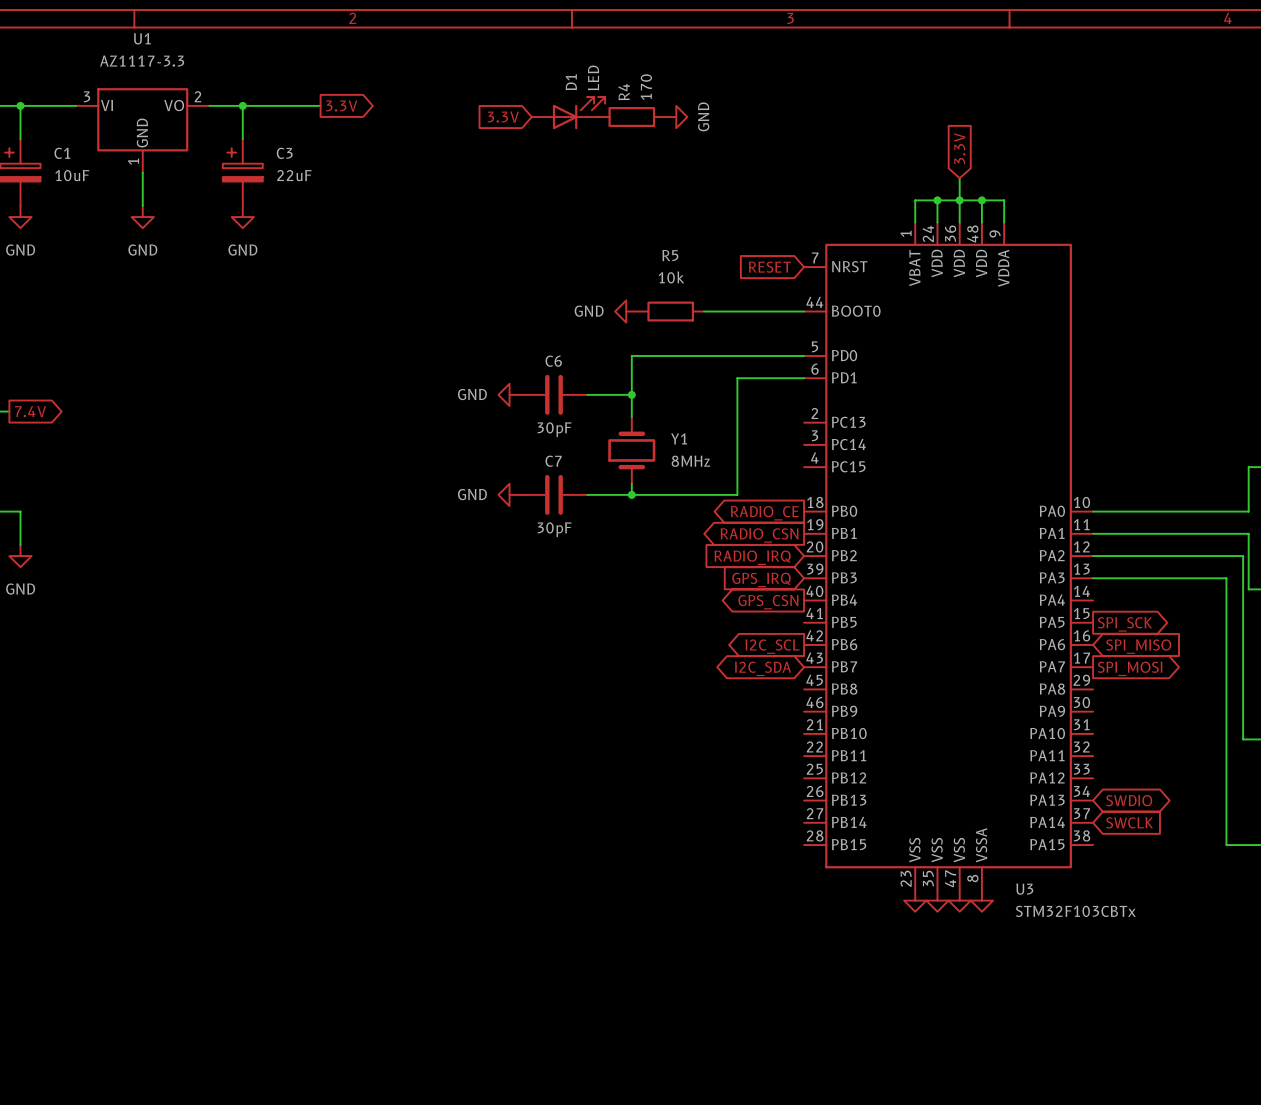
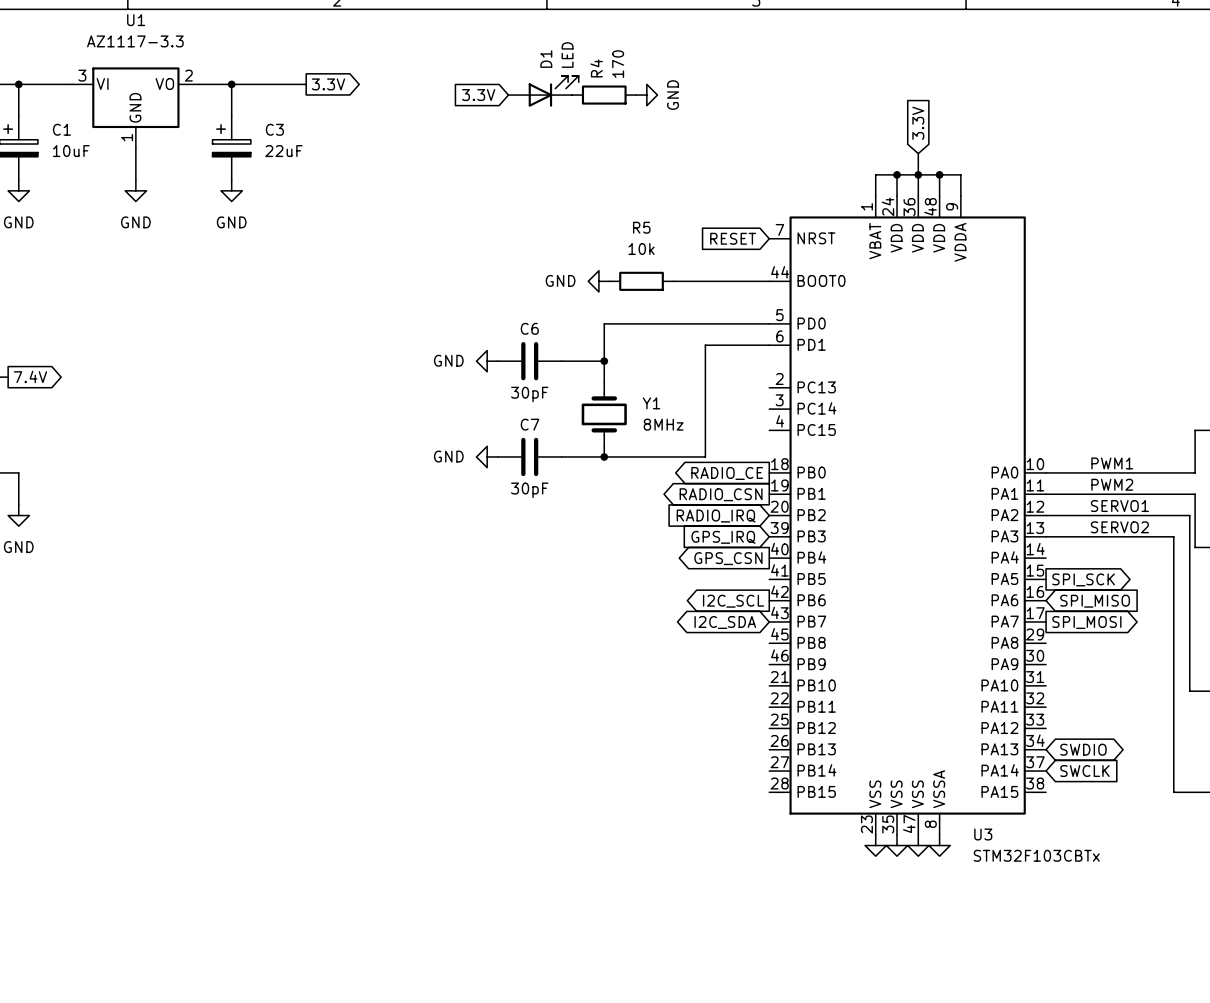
label: none -> PWM1 (1112, 463)
label: none -> PWM2 (1112, 484)
label: none -> SERVO1 (1119, 506)
label: none -> SERVO2 (1119, 527)

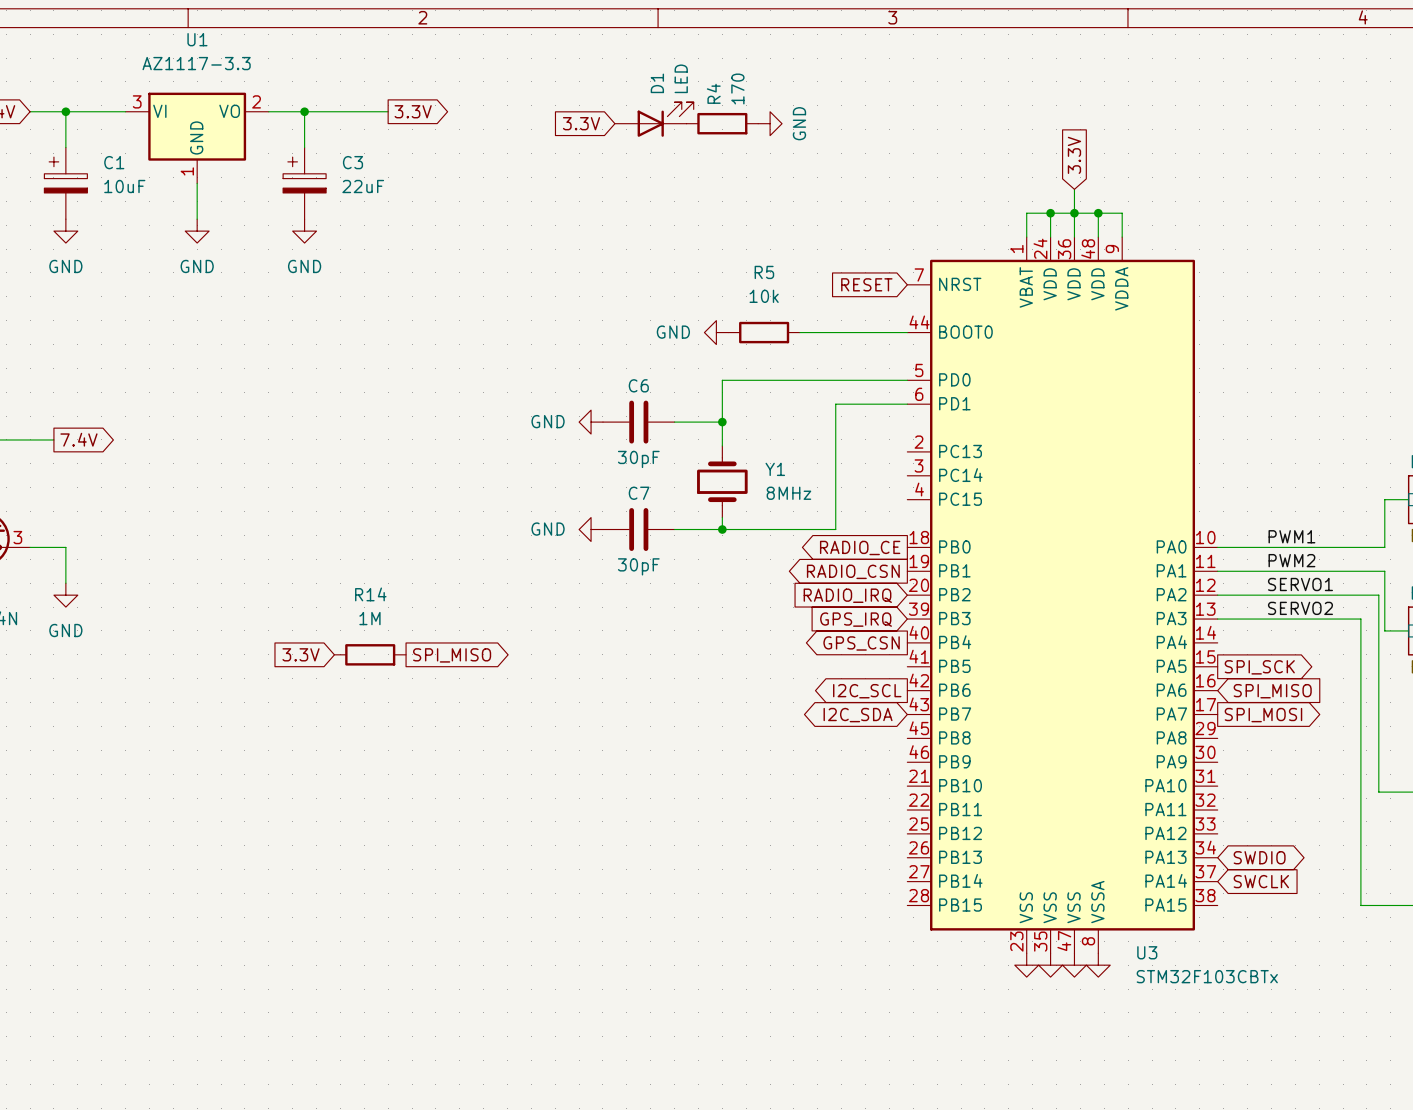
global label: none -> 3.3V (301, 654)
R14: none -> 1M (370, 654)
global label: none -> SPI_MISO (452, 655)

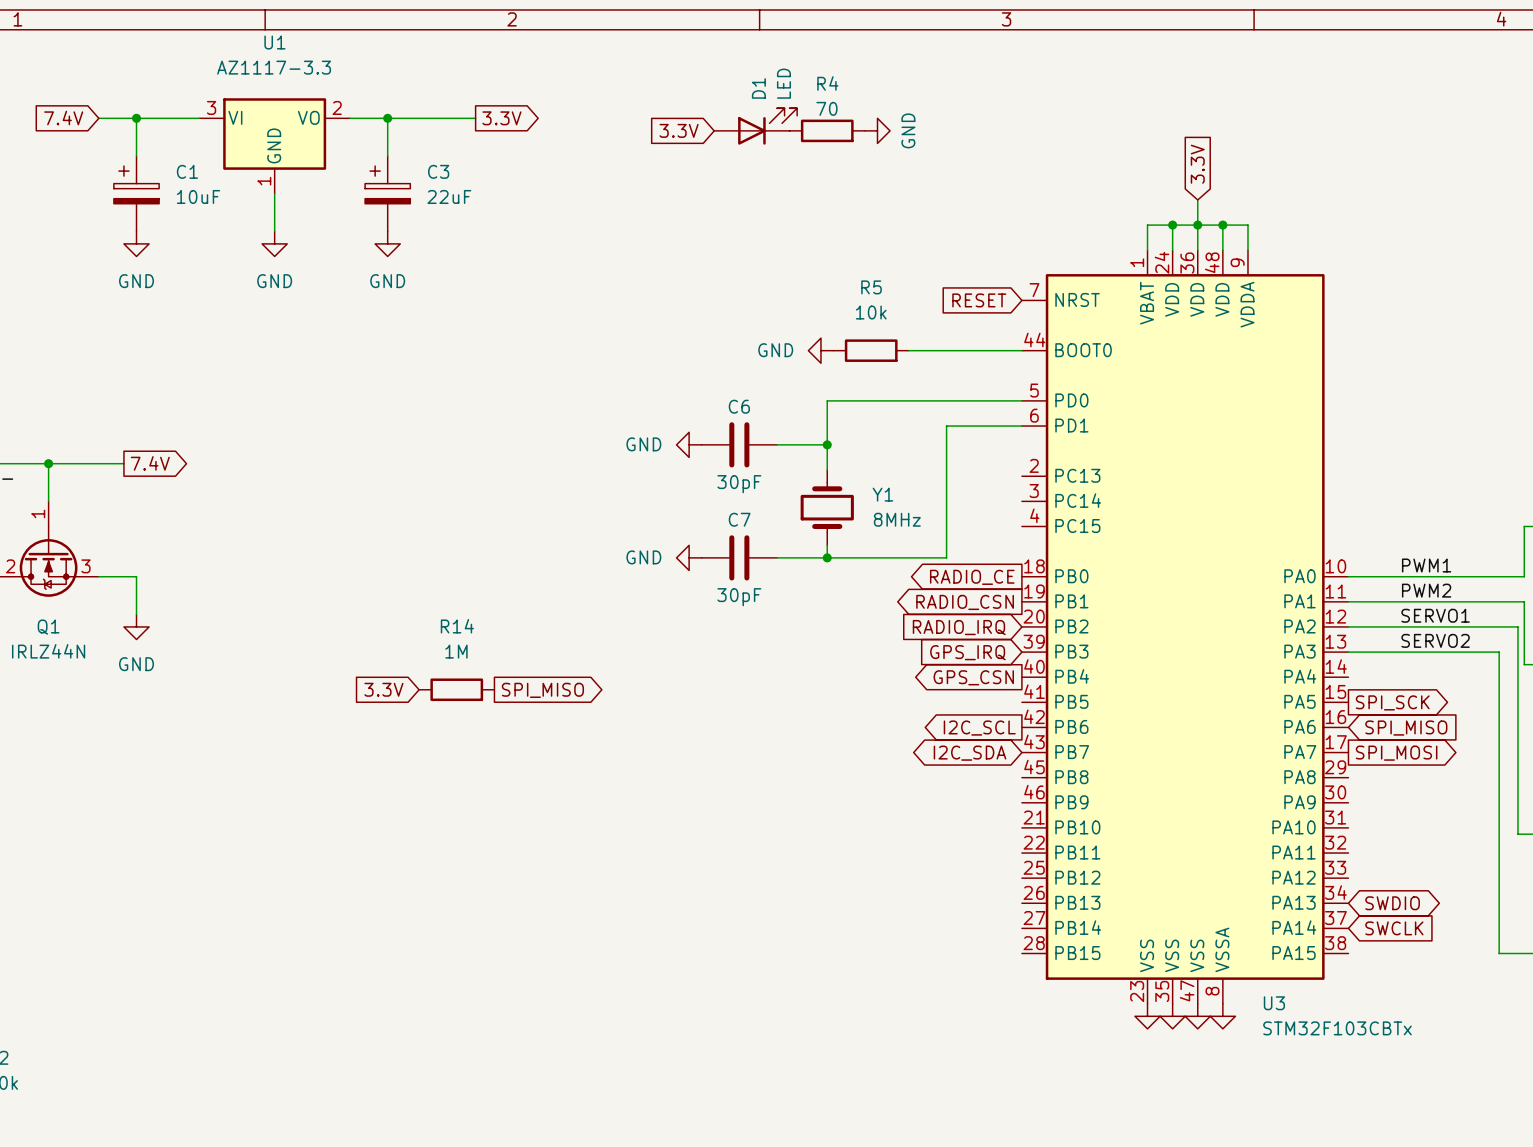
R4 value: 170 (737, 88) -> 70 (826, 108)
R4 name rotation: 0° (713, 93) -> 90° clockwise (827, 83)

